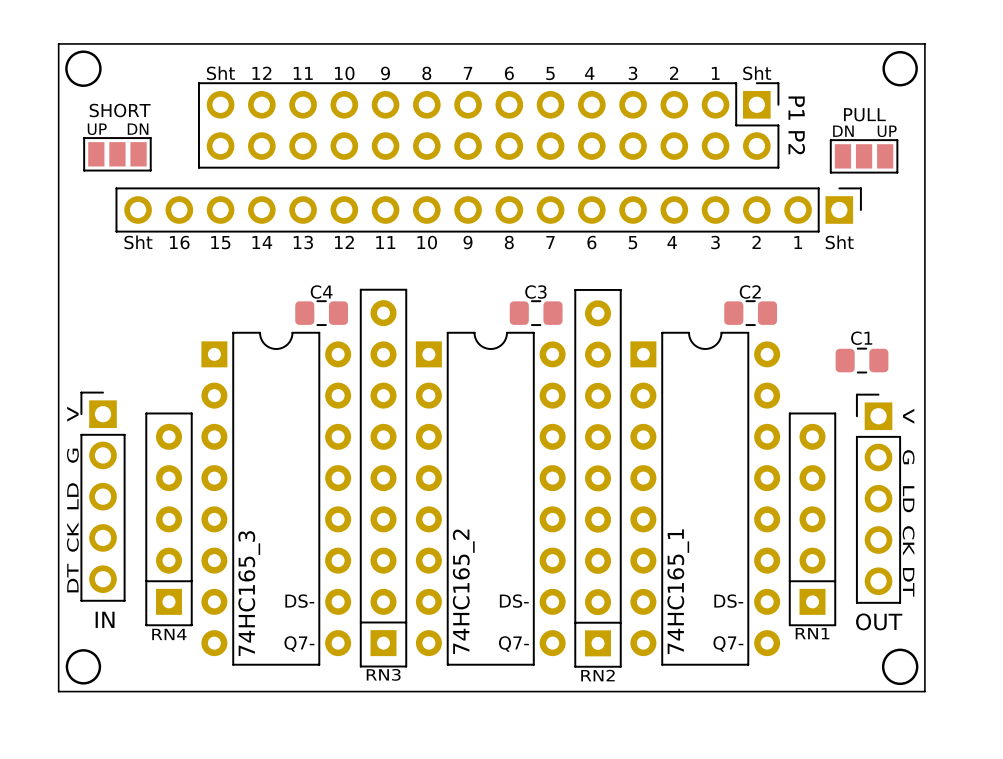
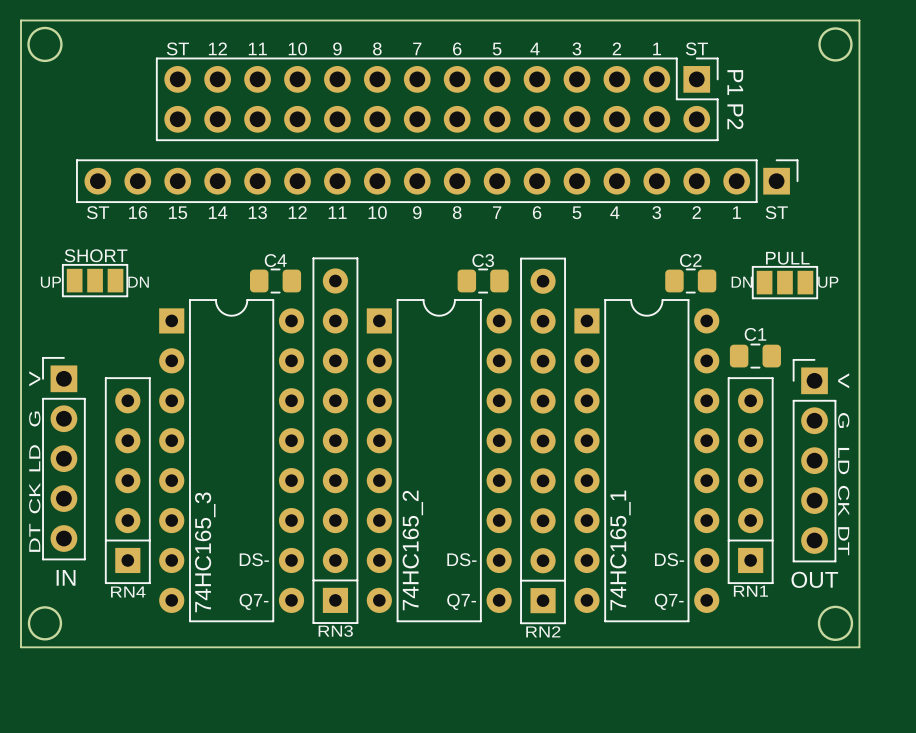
text: Sht (220, 73) -> ST (177, 48)
text: Sht (757, 73) -> ST (696, 48)
text position: SHORT (120, 110) -> SHORT (96, 255)
text position: PULL (864, 114) -> PULL (787, 258)
part: (117, 154) -> none
part: (864, 156) -> none
text: Sht (138, 242) -> ST (98, 212)
text: Sht (839, 242) -> ST (776, 212)
part: none -> (95, 280)
part: none -> (784, 282)
C1 position: (862, 360) -> (755, 356)

